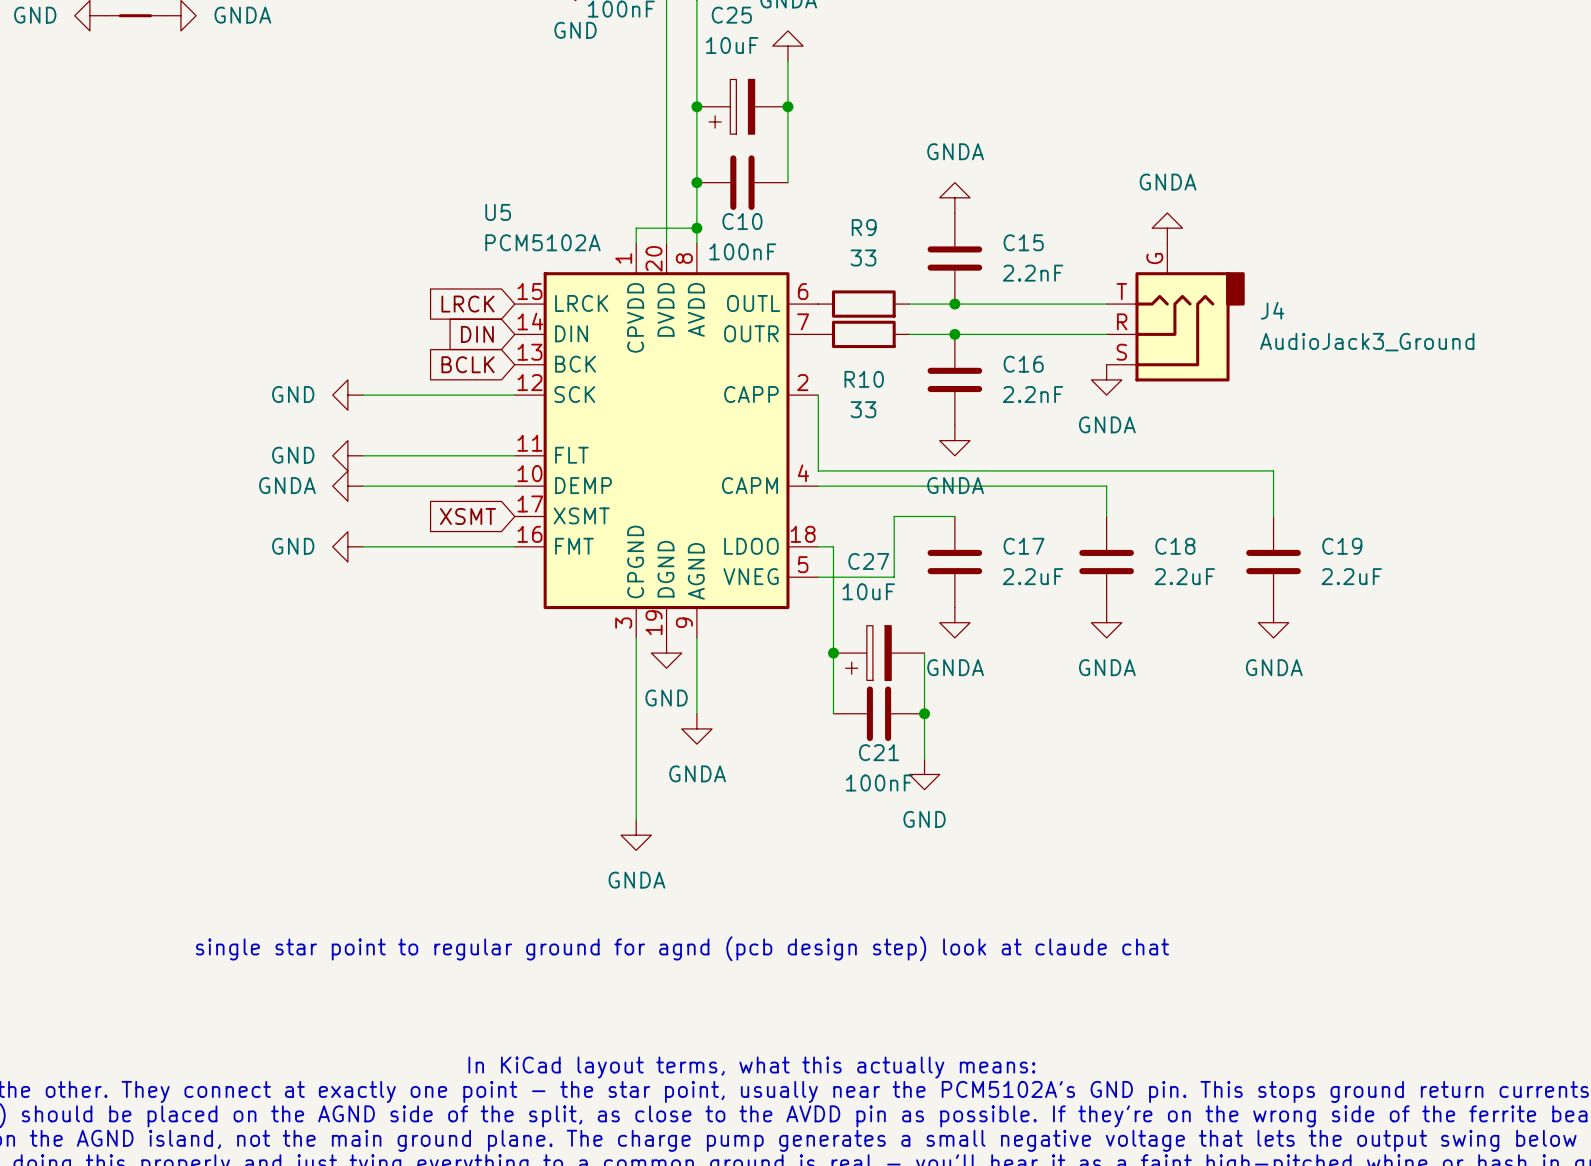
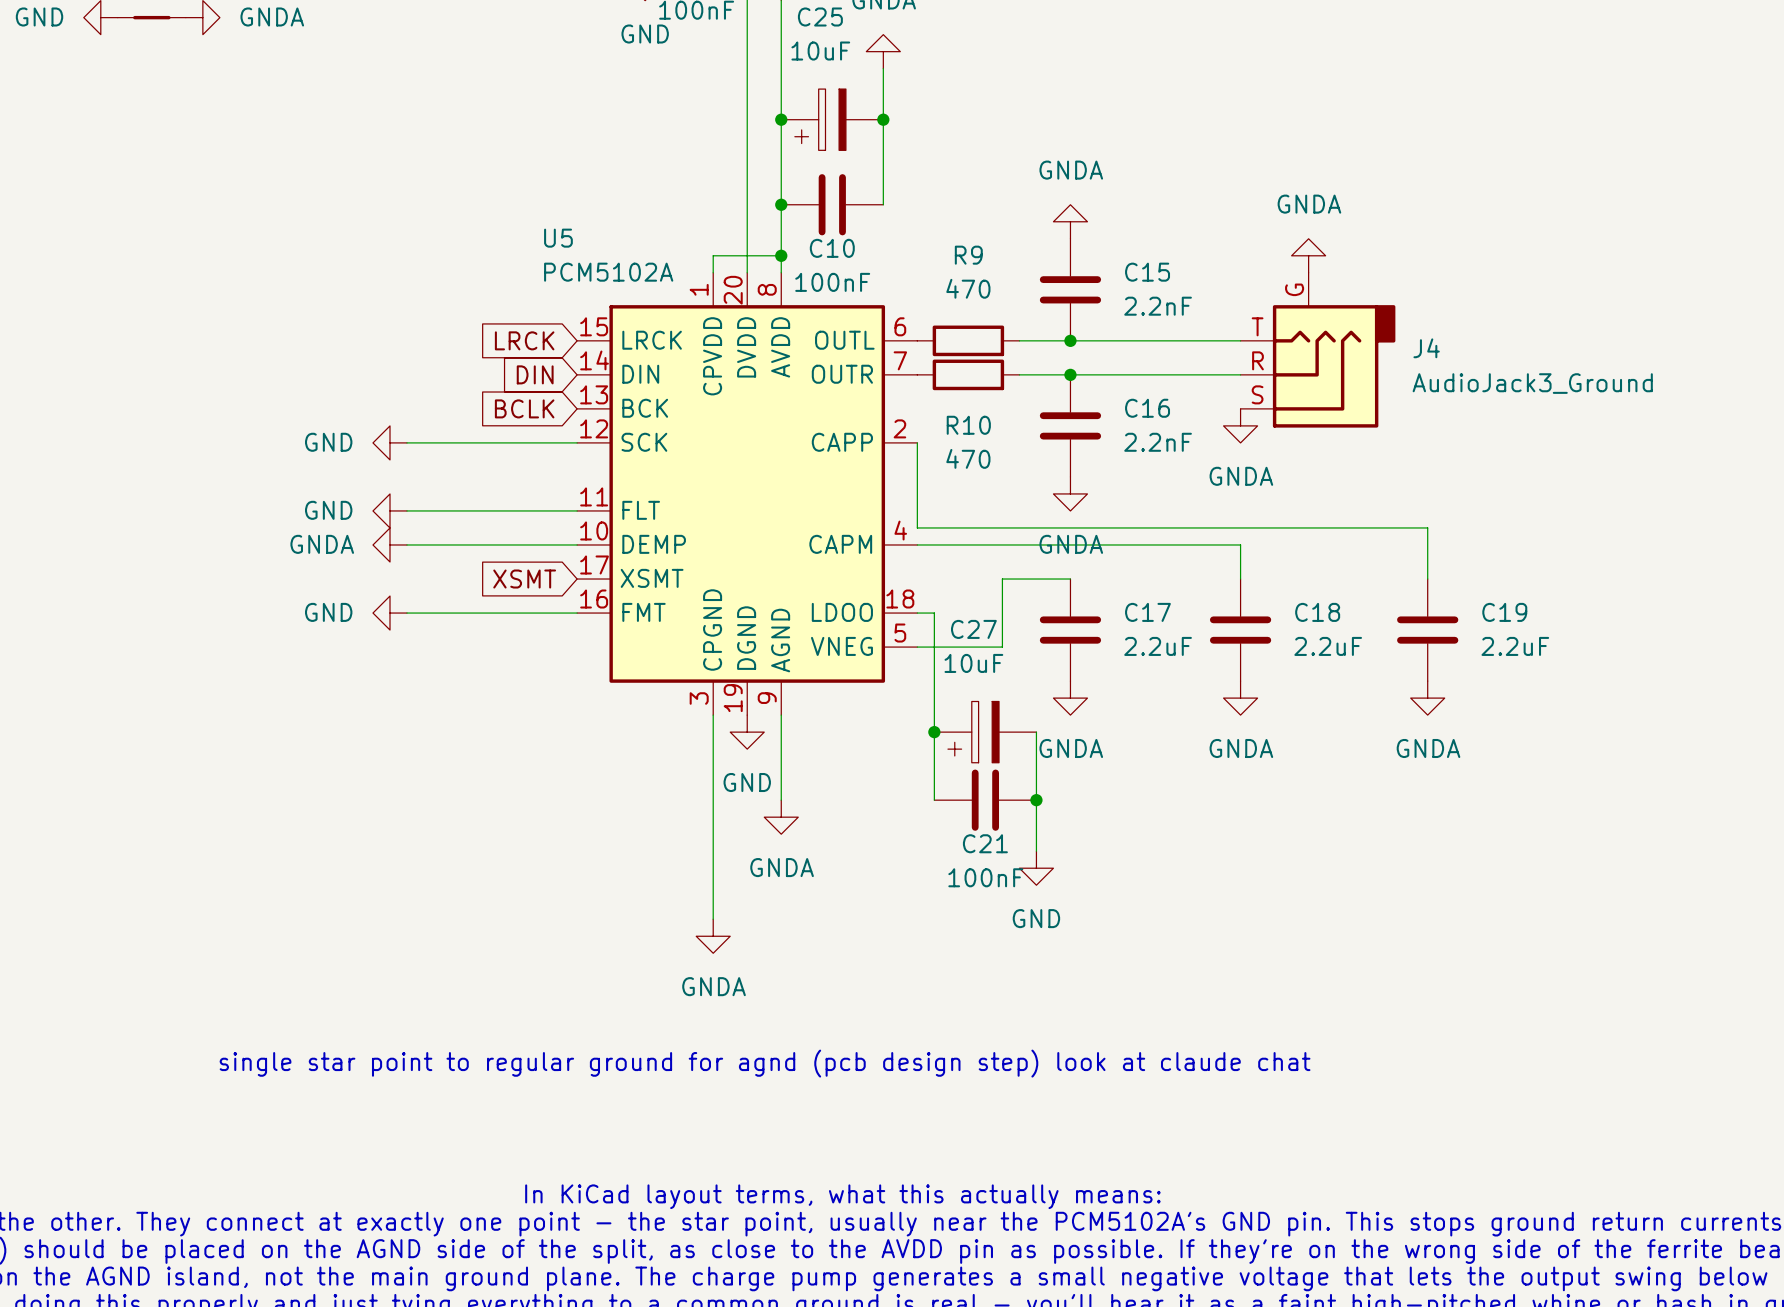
R9 value: 33 (863, 257) -> 470 (968, 288)
R10 value: 33 (863, 409) -> 470 (968, 458)

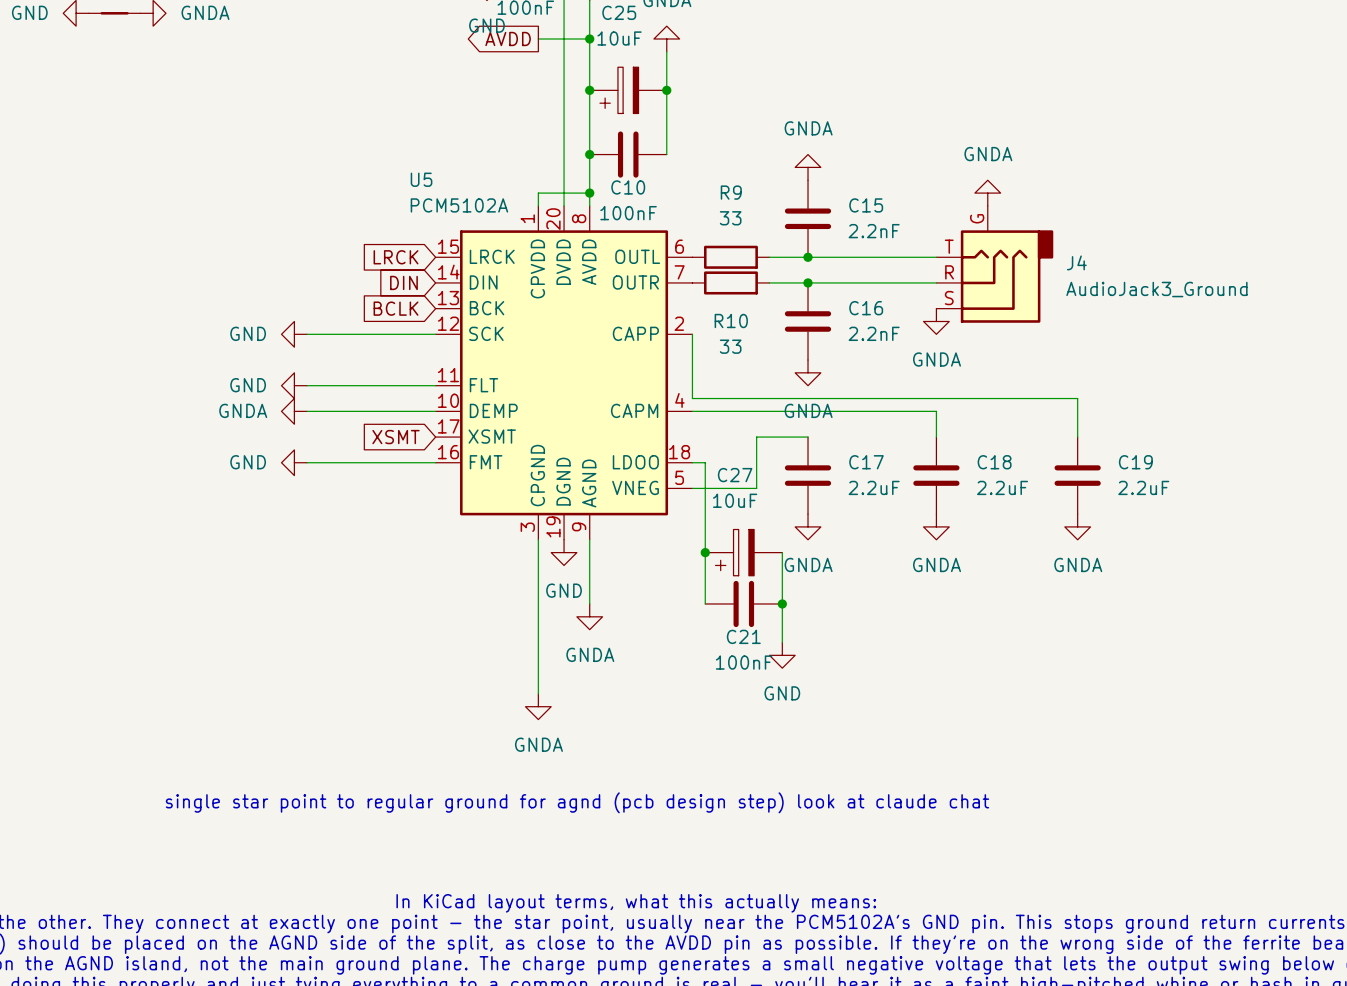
global label: none -> AVDD (508, 38)
wire: none -> (538, 38) (589, 38)
junction: none -> (589, 38)
R9 value: 470 (968, 288) -> 33 (730, 218)
R10 value: 470 (968, 458) -> 33 (730, 346)

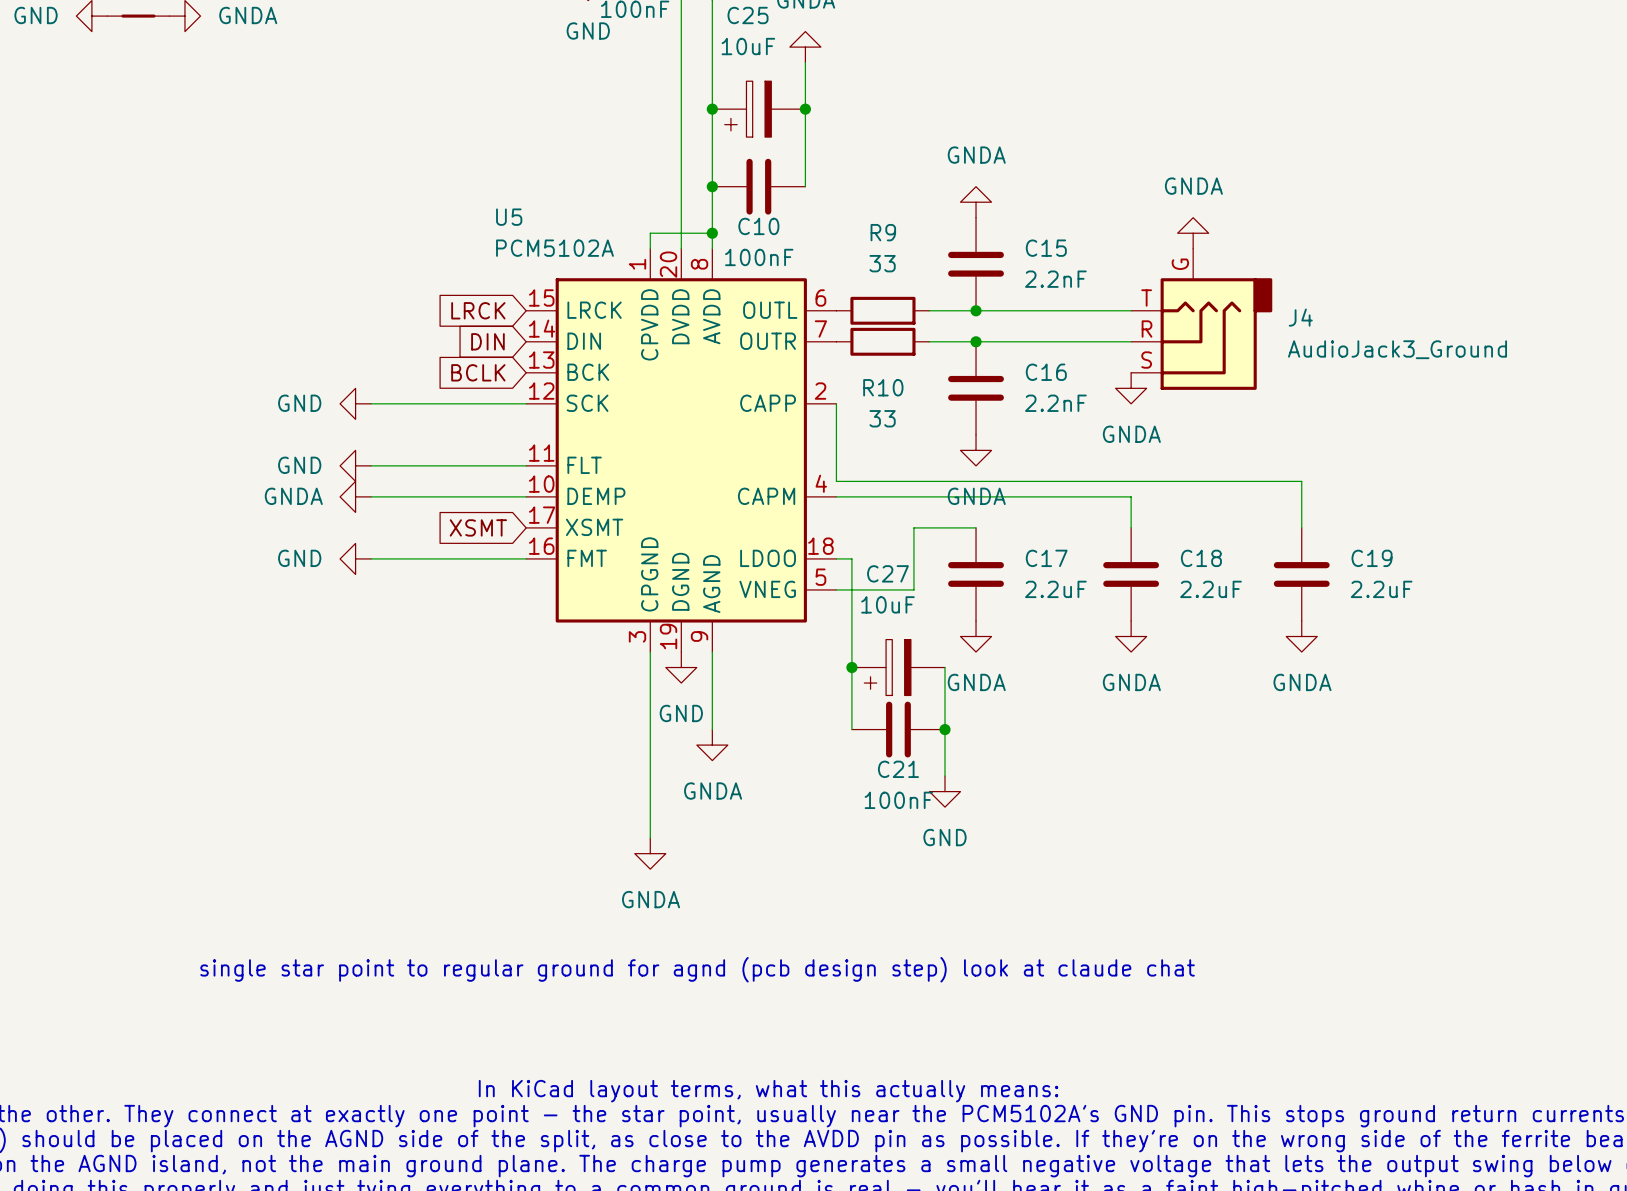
global label: AVDD (508, 38) -> none
wire: (538, 38) (589, 38) -> none
junction: (589, 38) -> none

